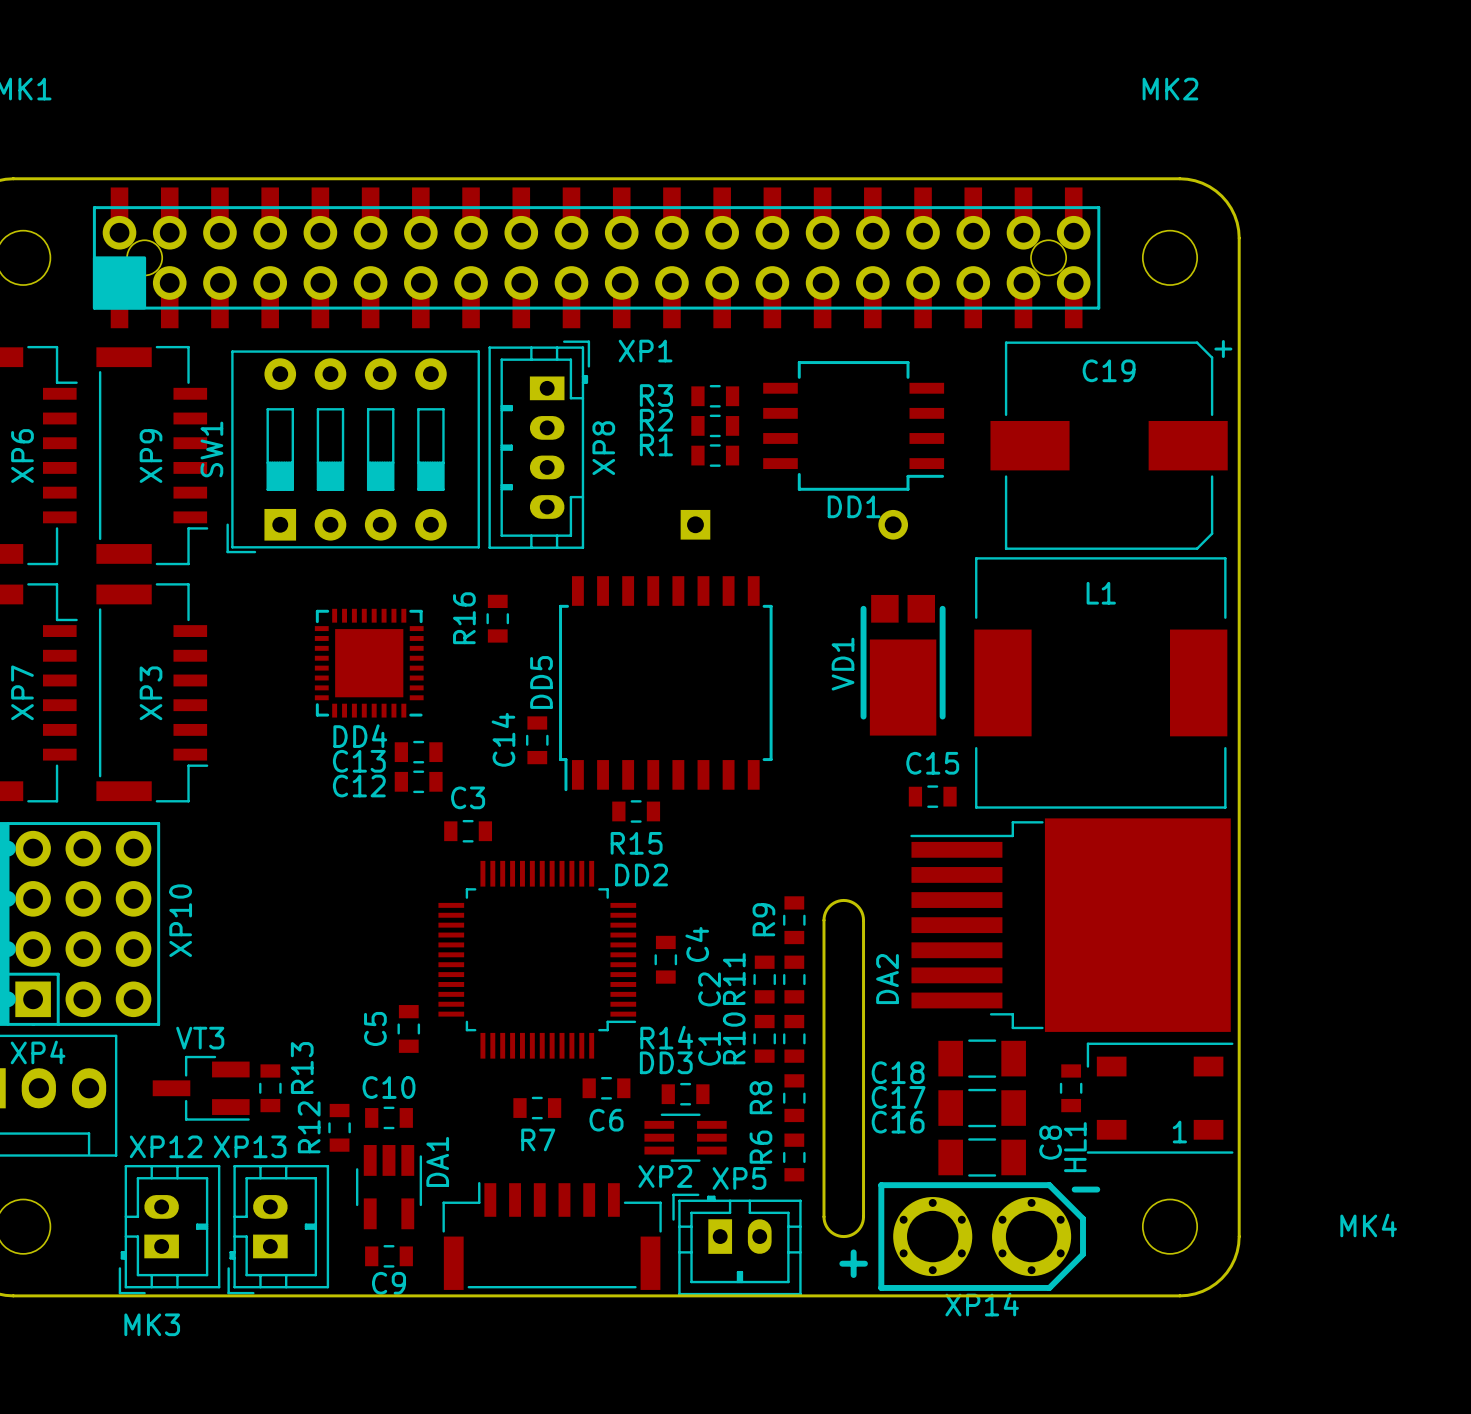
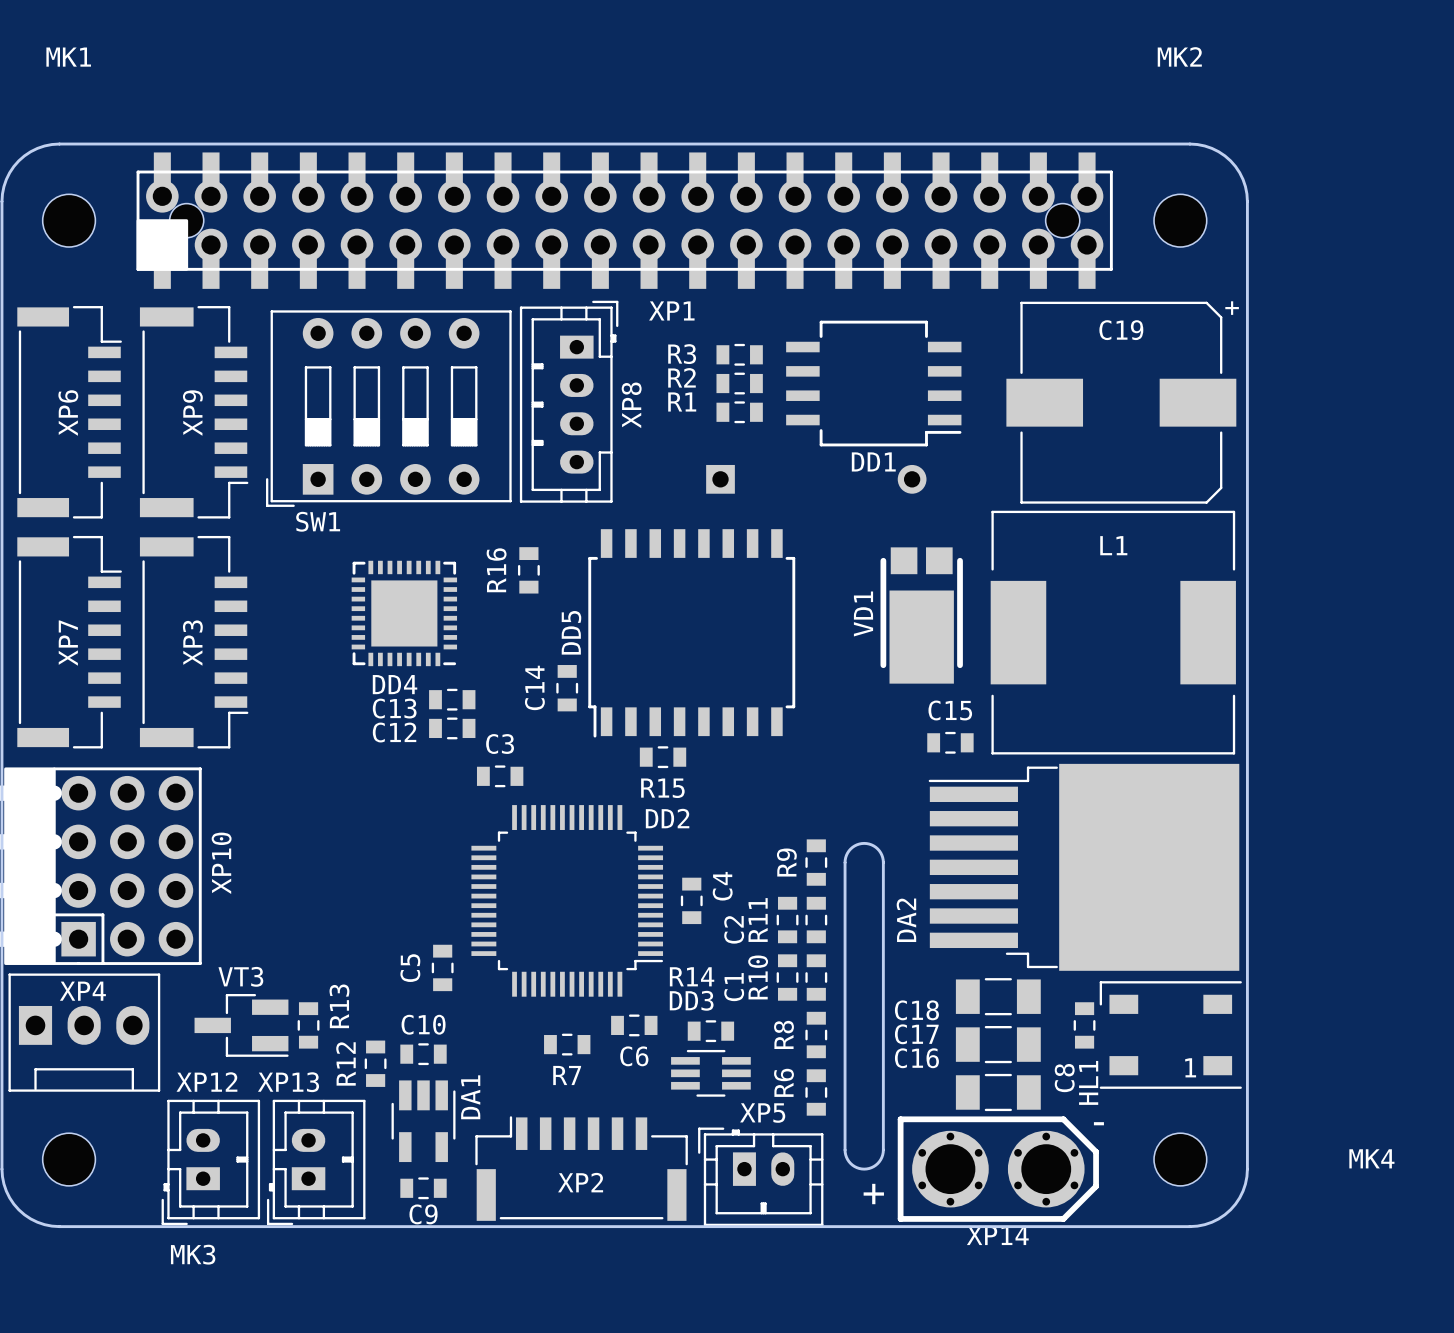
SW1 name rotation: 0° (211, 449) -> 90° clockwise (318, 521)
SW1 name position: SW1 (211, 449) -> SW1 (318, 521)
XP2 name position: XP2 (665, 1176) -> XP2 (580, 1182)

